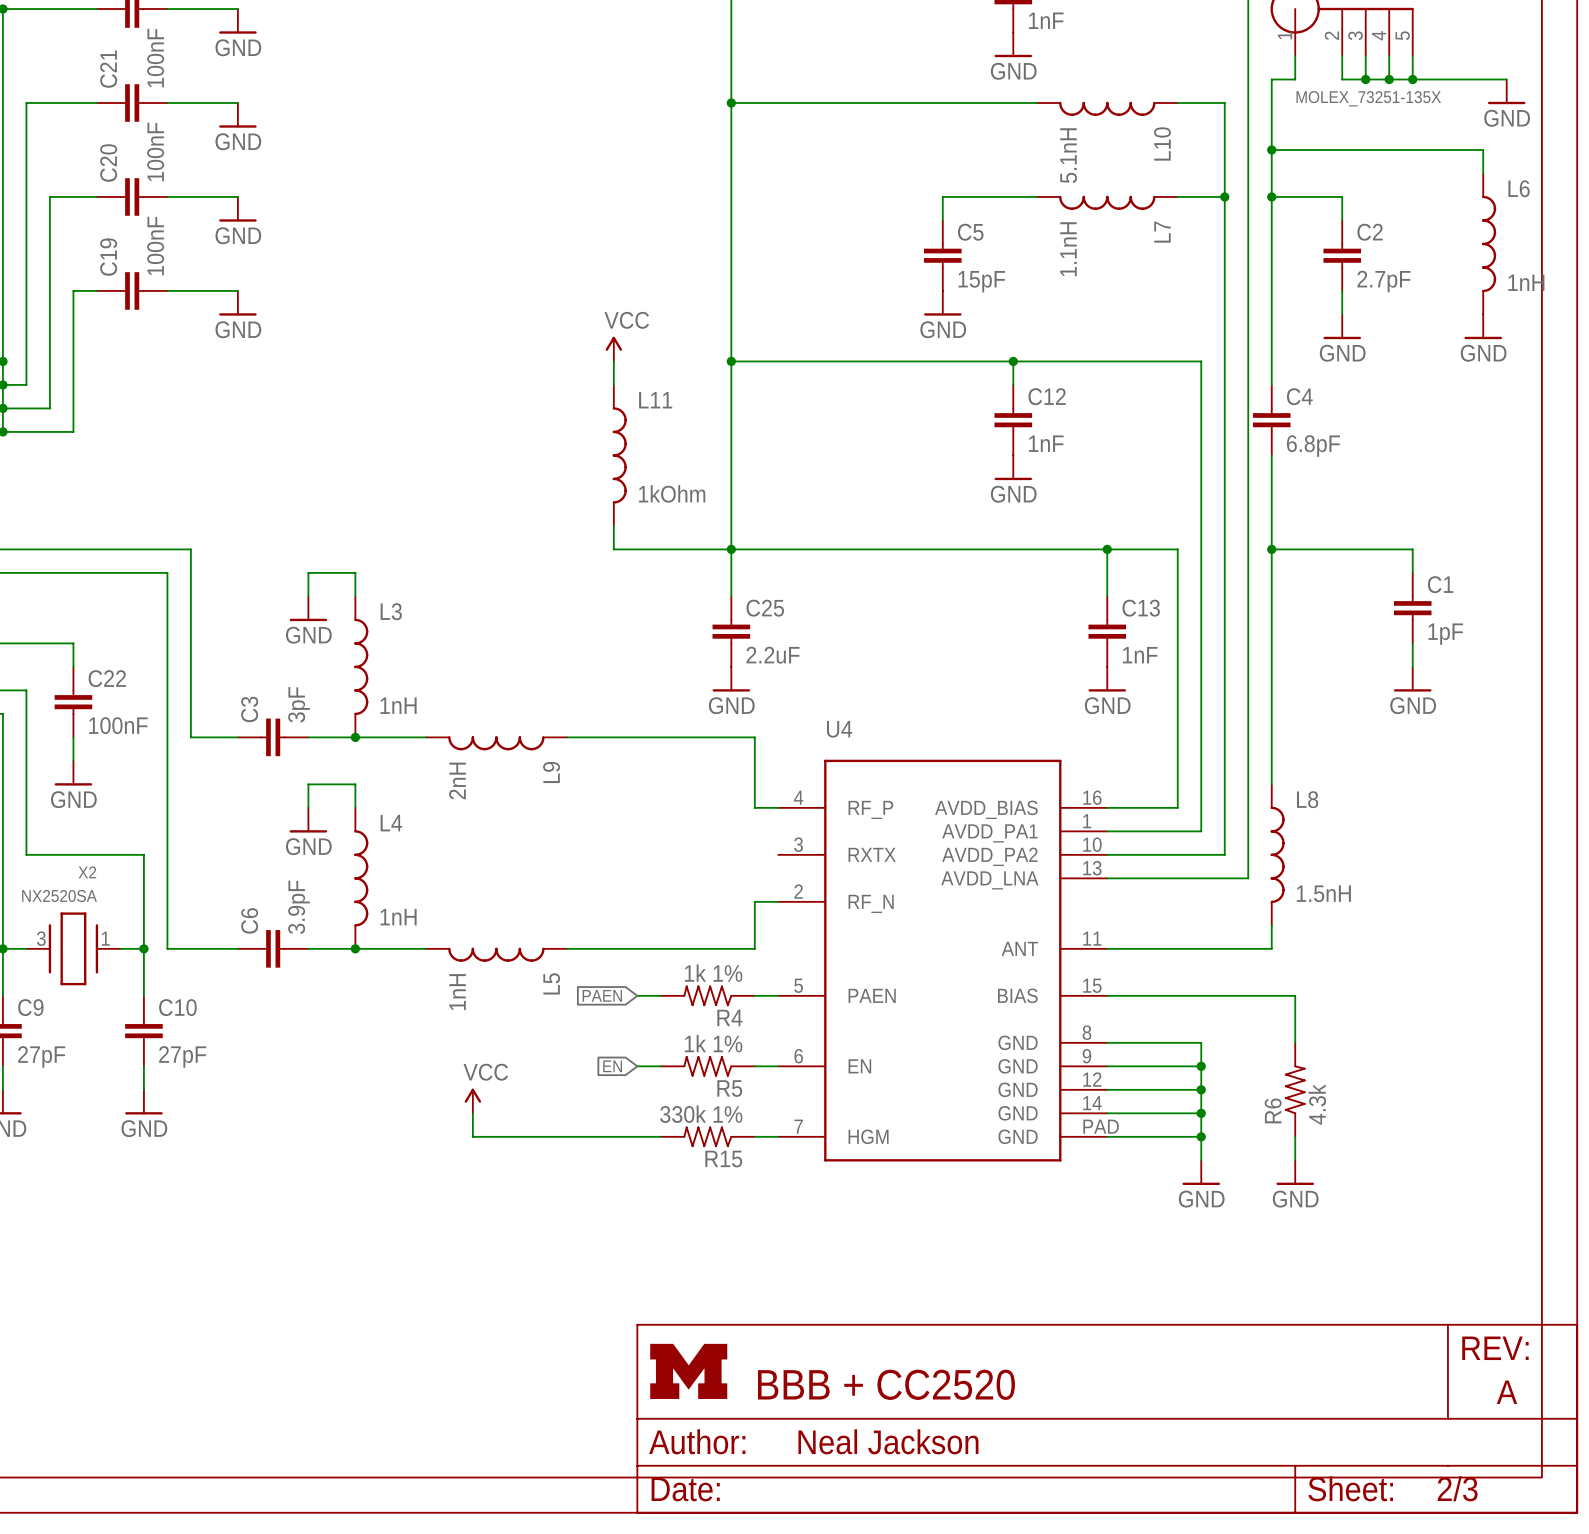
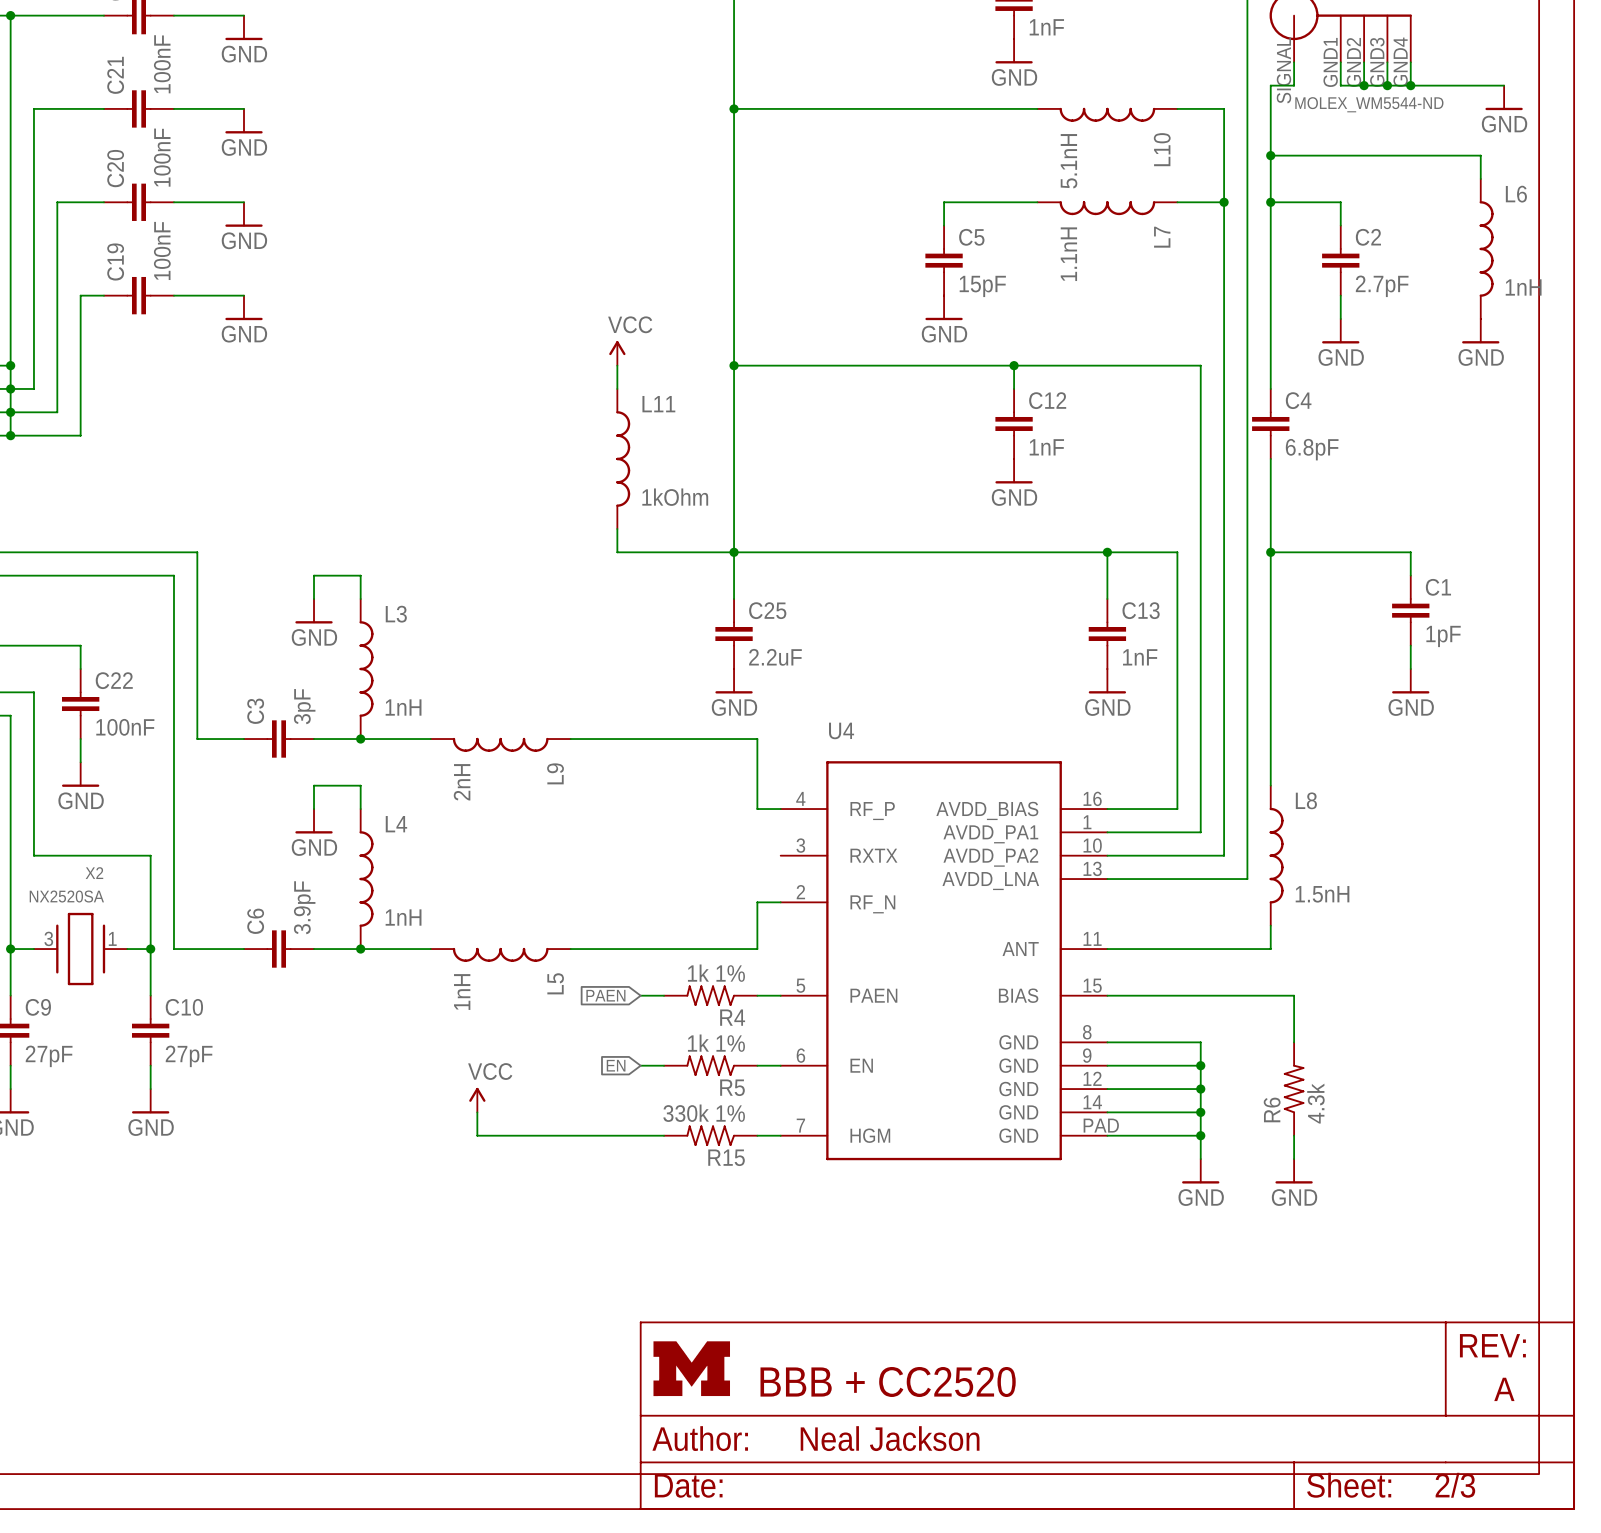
part pin number: 1 (1285, 35) -> SIGNAL (1283, 70)
part pin number: 2 (1331, 35) -> GND1 (1330, 62)
part pin number: 3 (1355, 35) -> GND2 (1353, 62)
part pin number: 4 (1379, 35) -> GND3 (1377, 62)
part pin number: 5 (1402, 35) -> GND4 (1400, 62)
part value: MOLEX_73251-135X (1368, 98) -> MOLEX_WM5544-ND (1369, 104)

